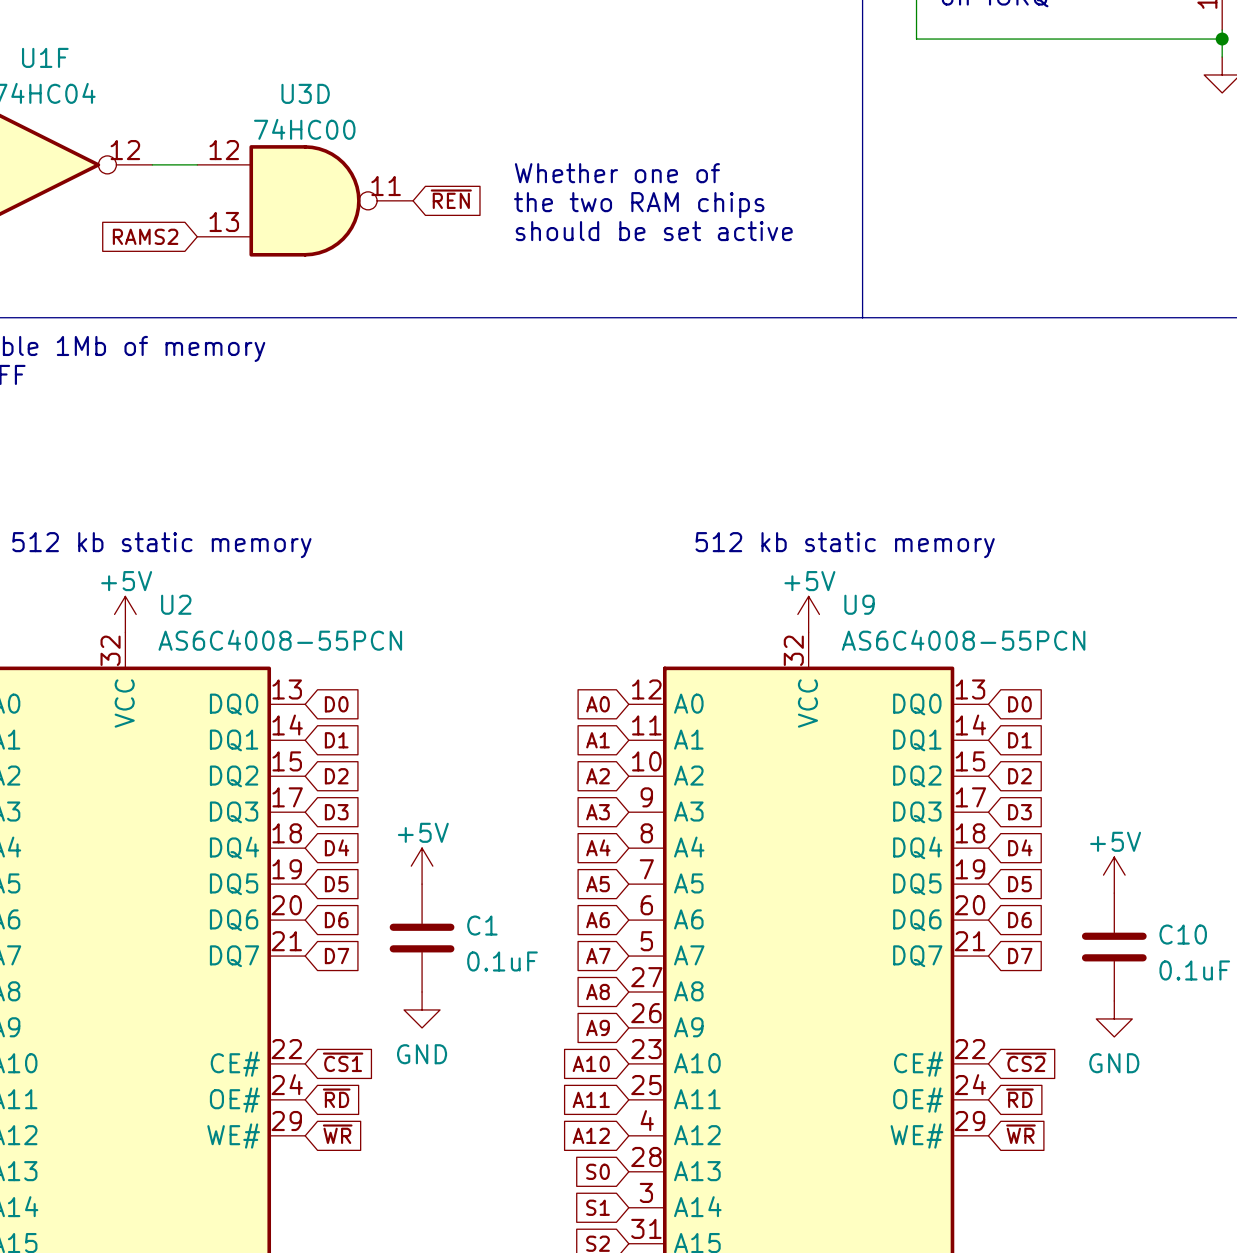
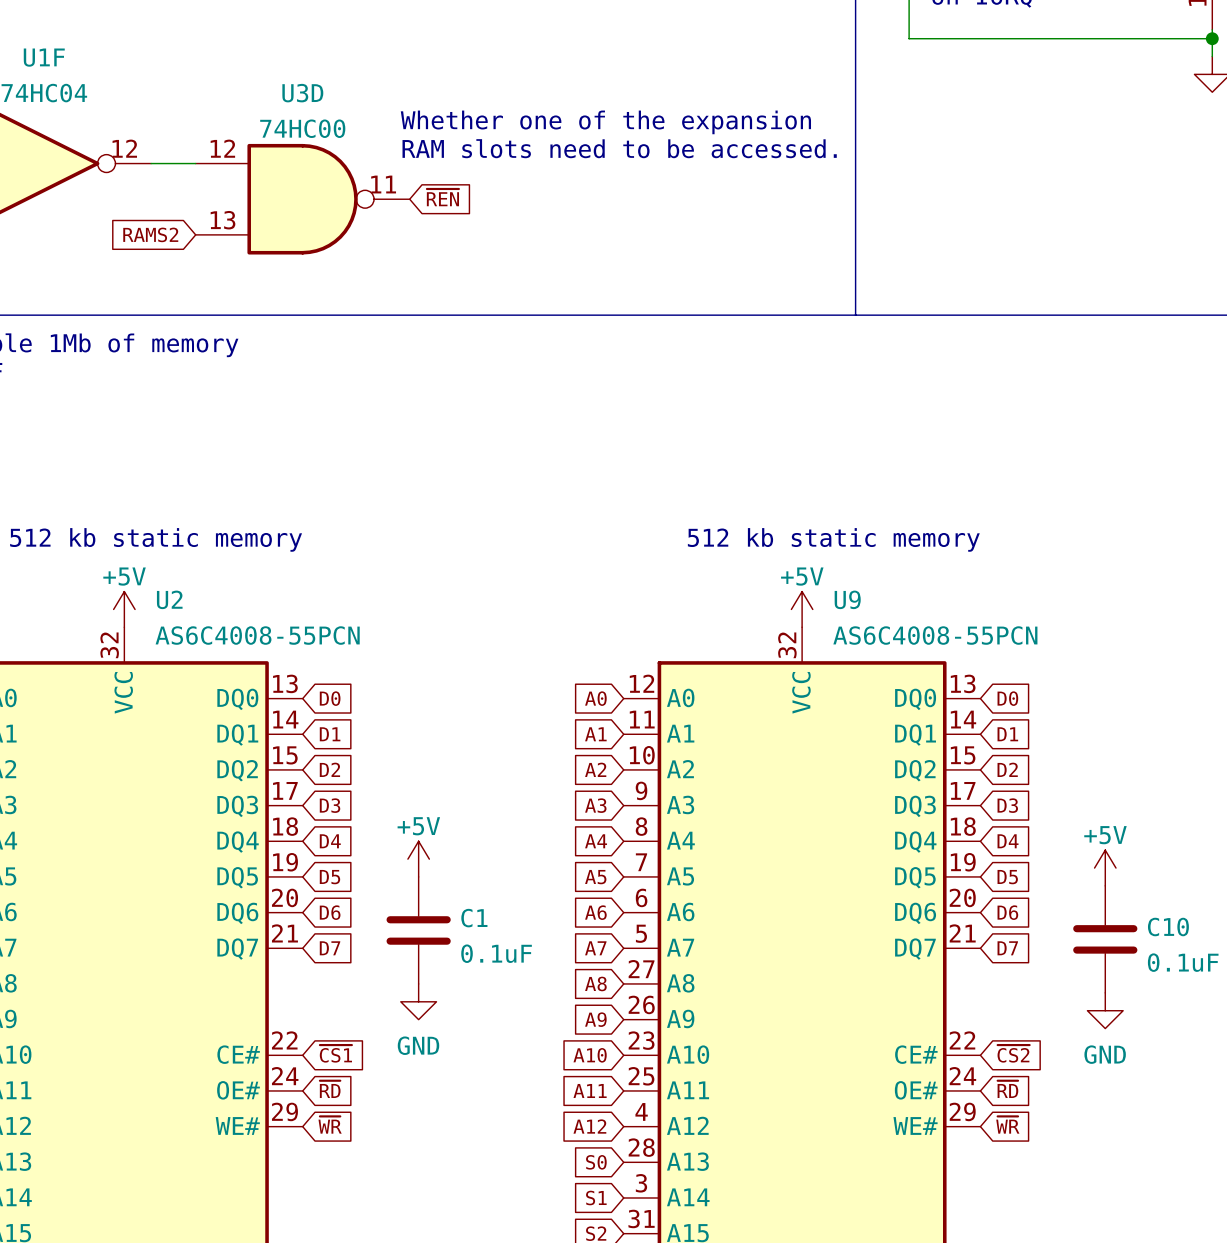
text: none -> Whether one of the expansion (605, 122)
text: none -> RAM slots need to be accessed. (619, 148)
text: Whether one of (617, 173) -> none
text: the two RAM chips (639, 205) -> none
text: should be set active (654, 231) -> none

